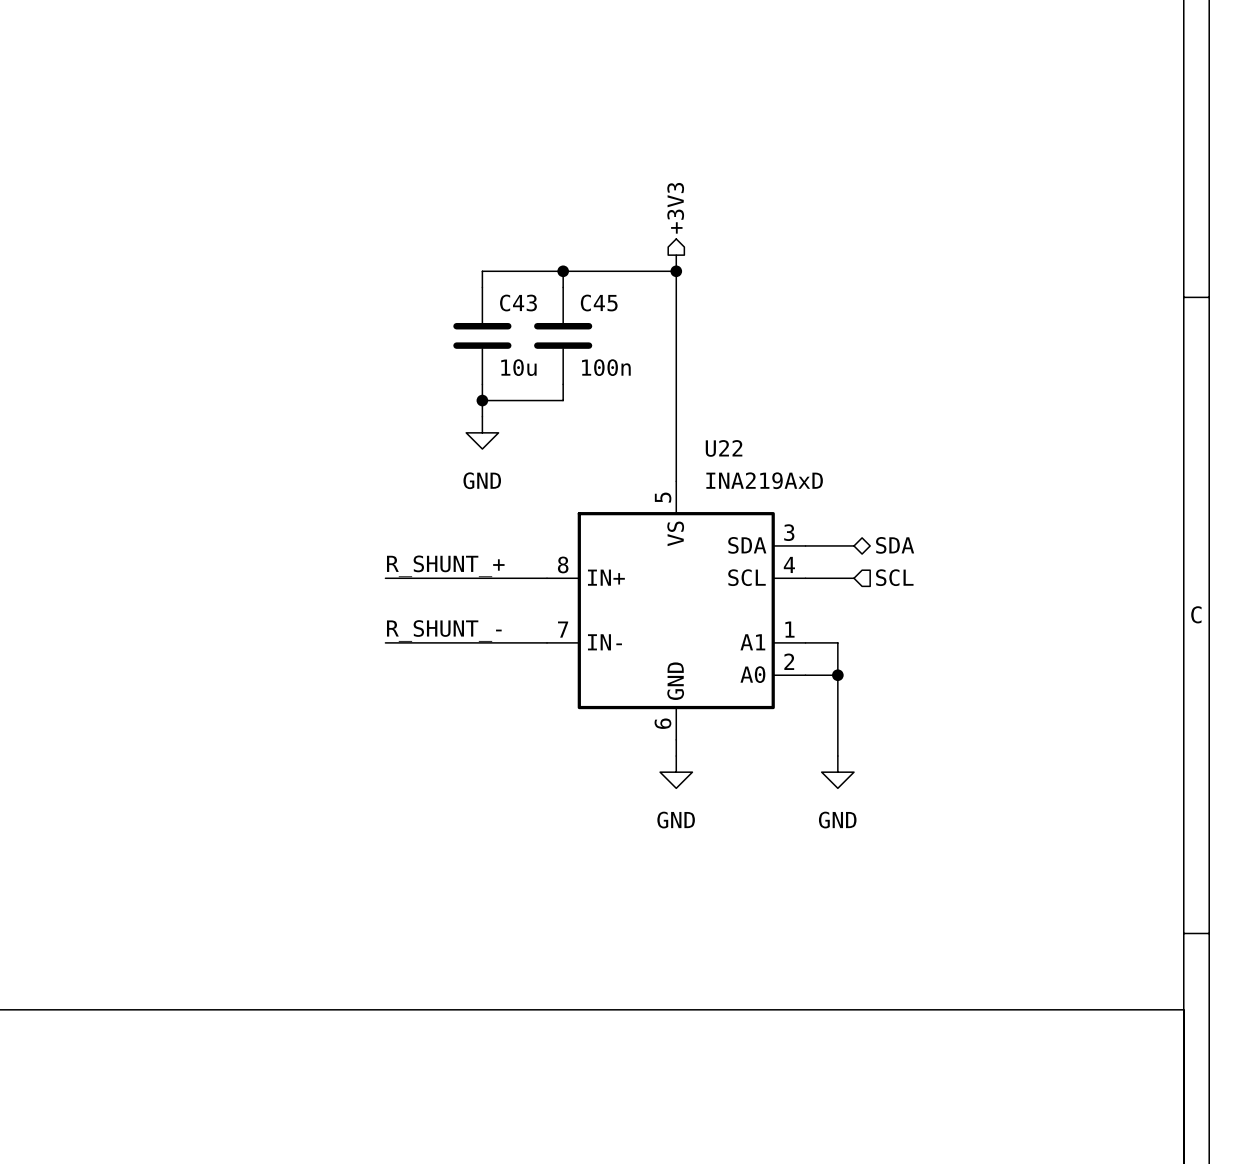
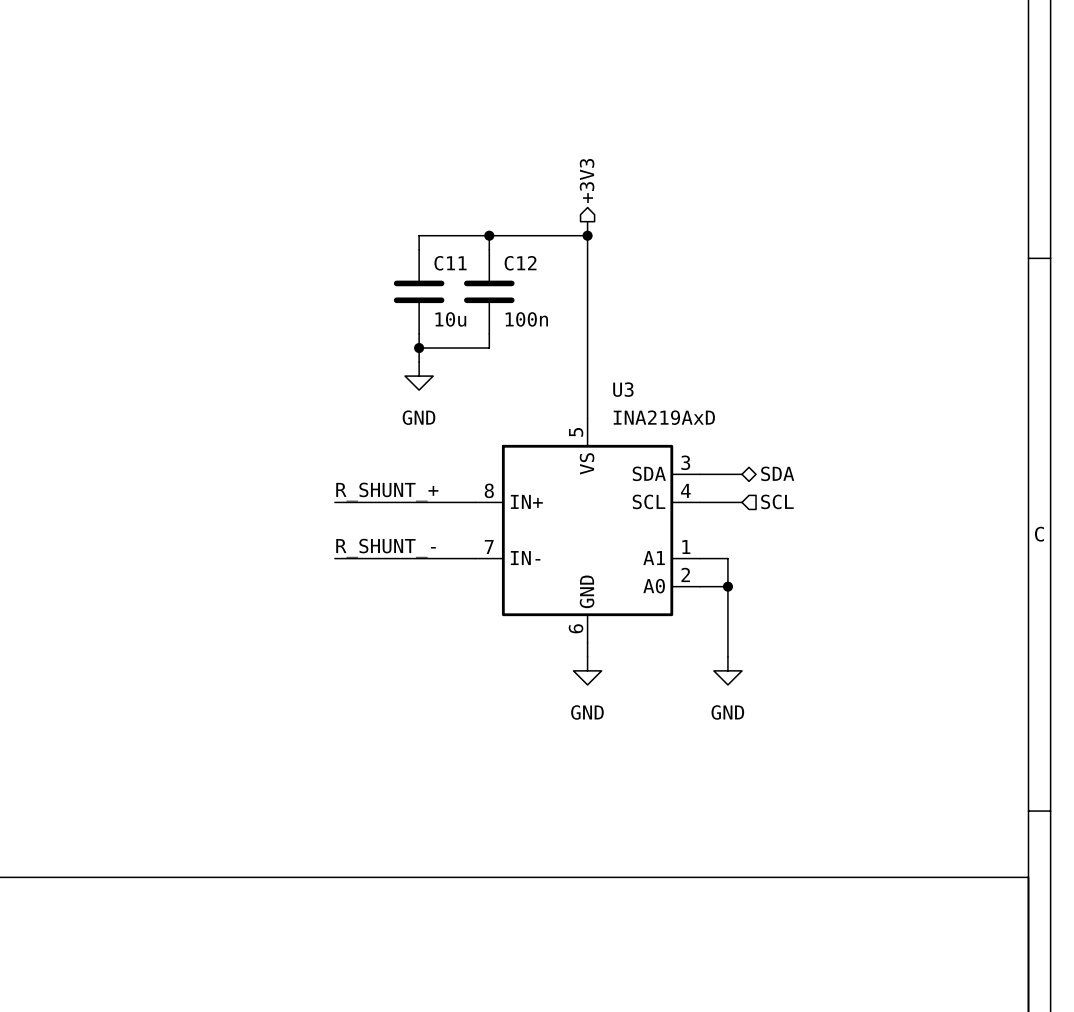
C43 name: C43 (518, 303) -> C11 (450, 263)
C45 name: C45 (599, 303) -> C12 (520, 263)
U22 name: U22 (724, 448) -> U3 (623, 389)

